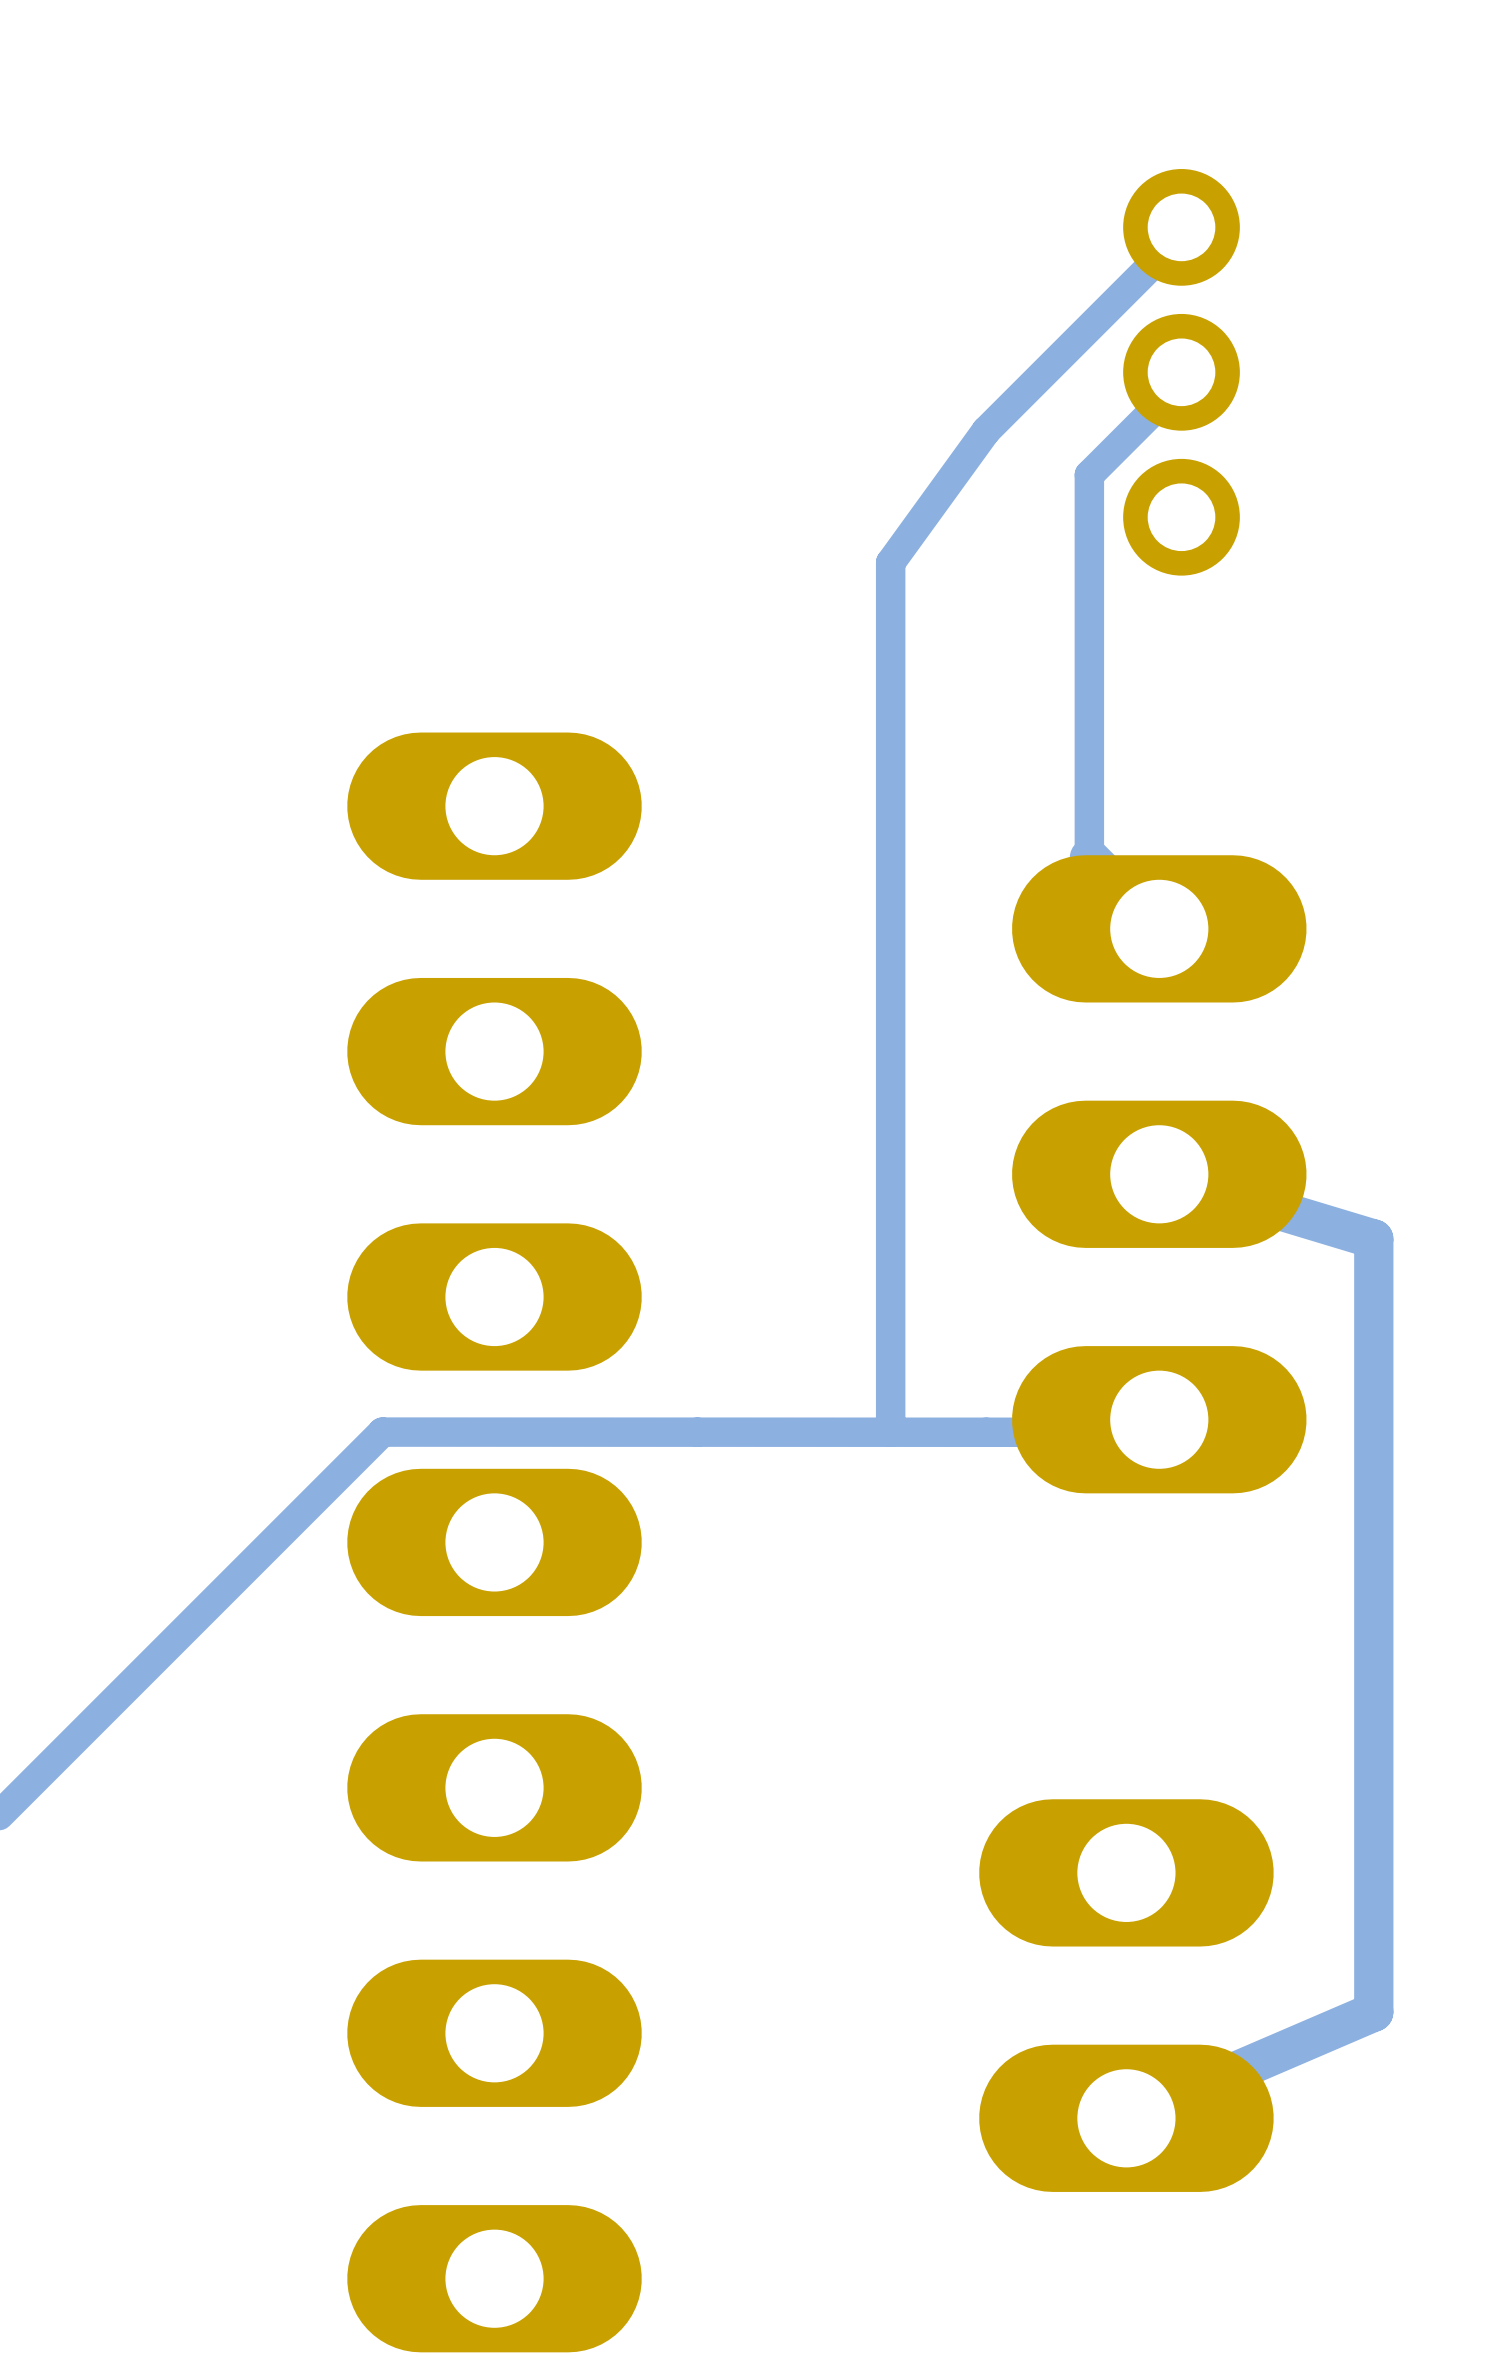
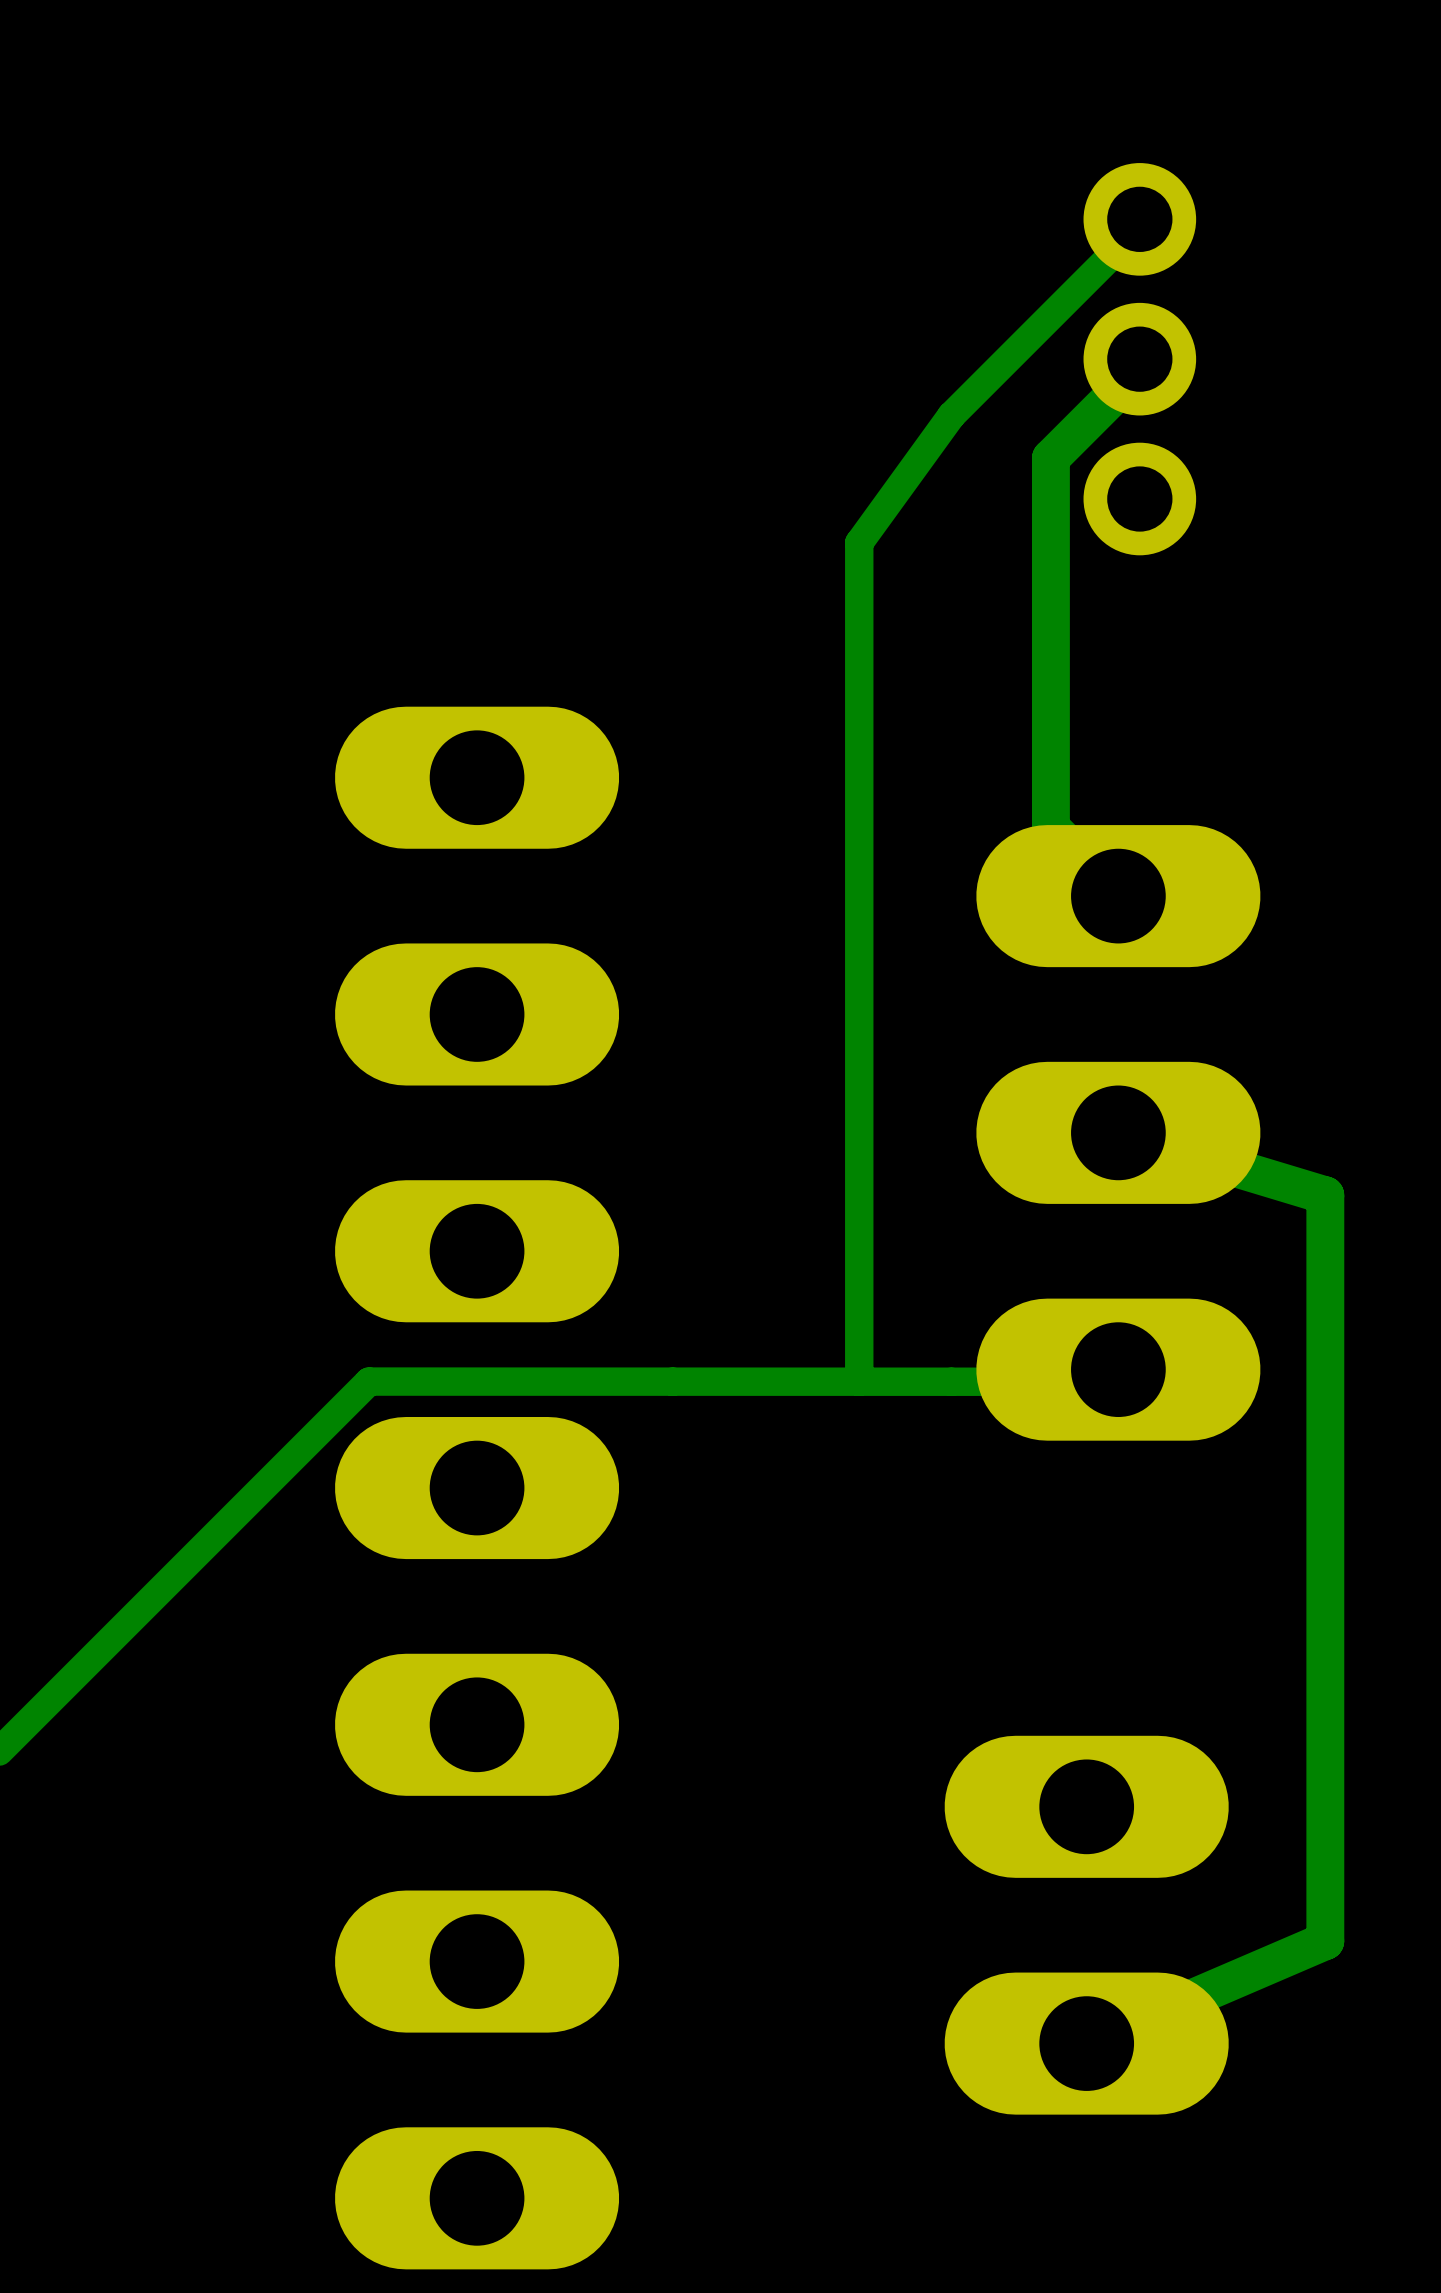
track width: thin (1177, 386) (1089, 474) (1089, 857) -> thick (1136, 372) (1050, 458) (1050, 827)

